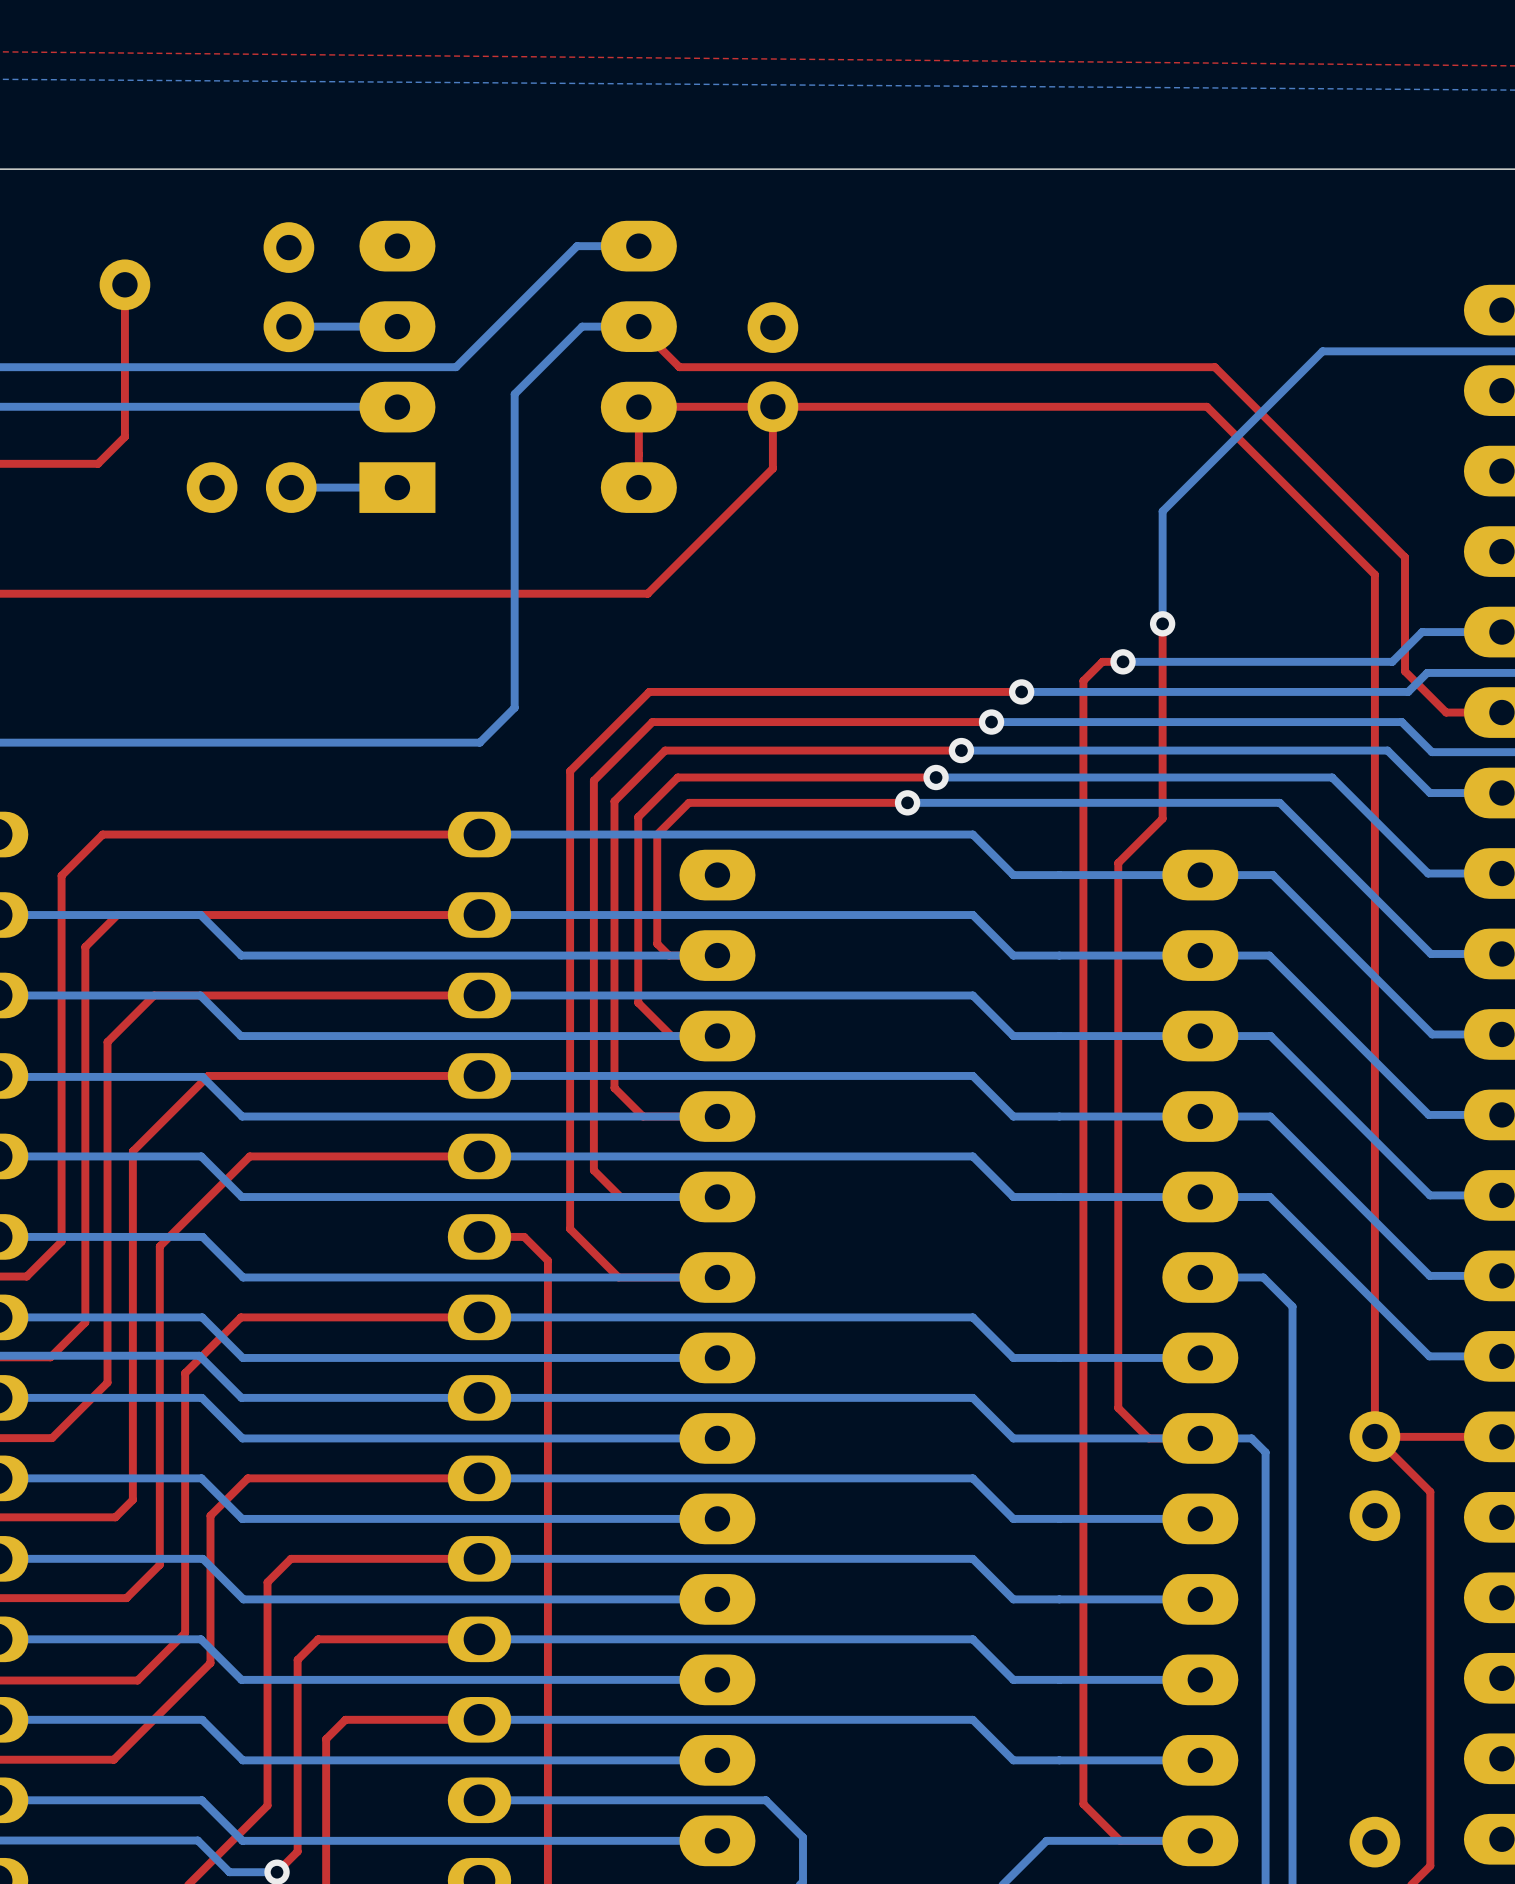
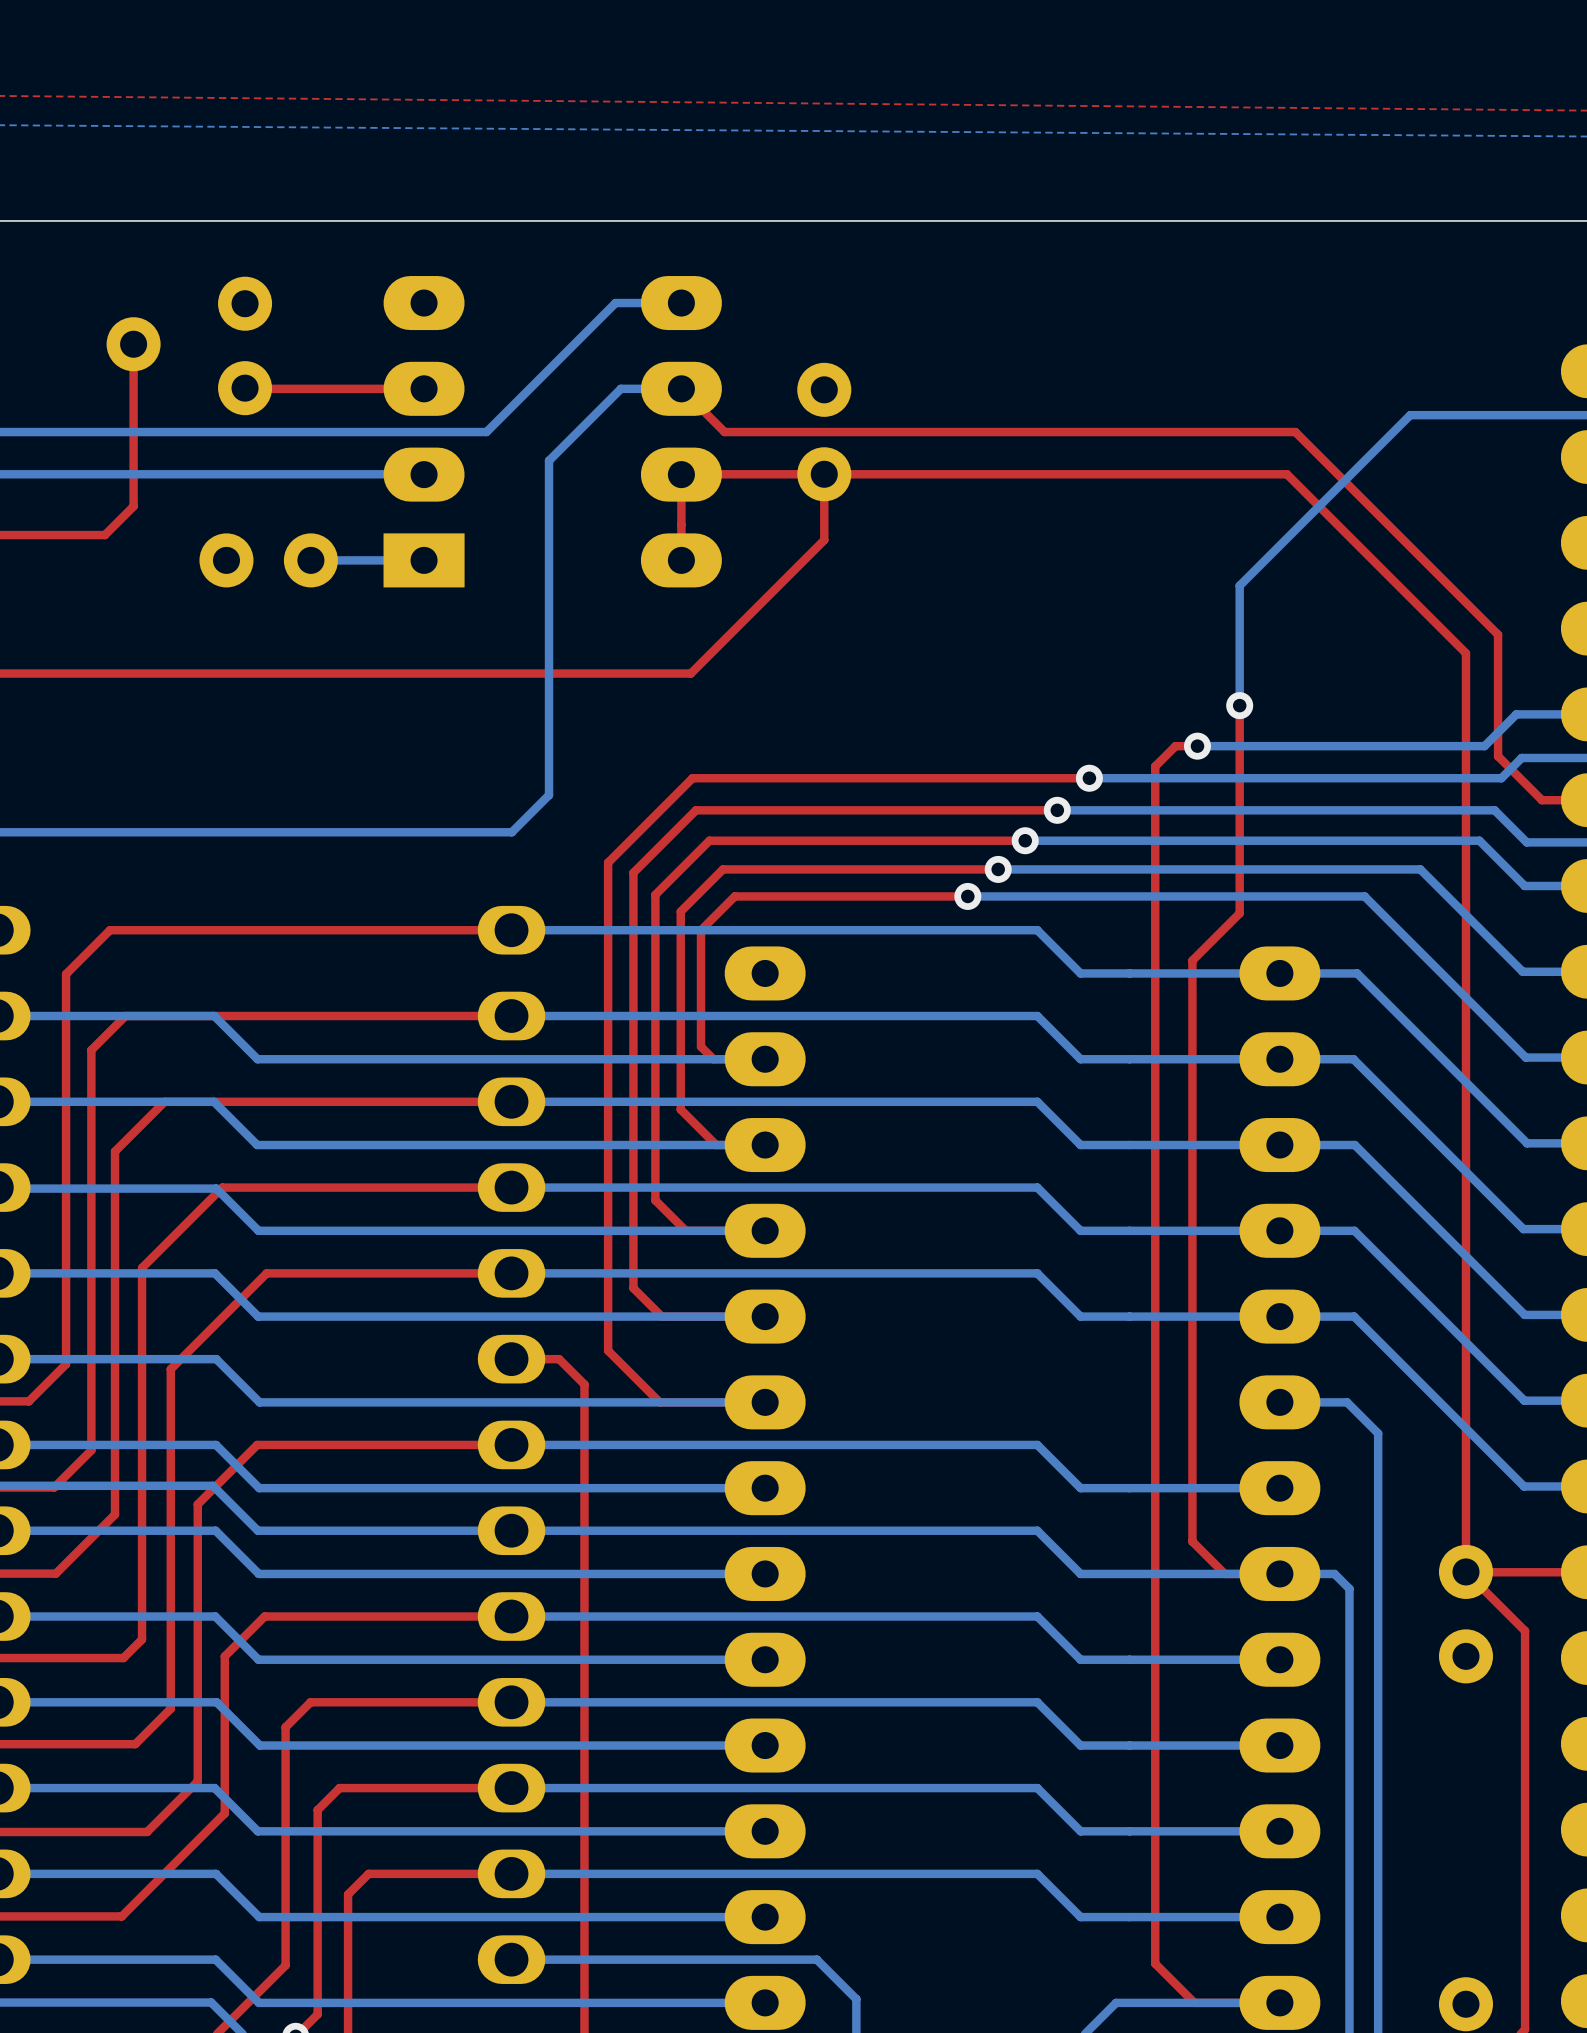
part position: (288, 287) -> (245, 345)
top track: none -> (245, 388) (424, 388)
bottom track: (397, 326) (289, 326) -> none

